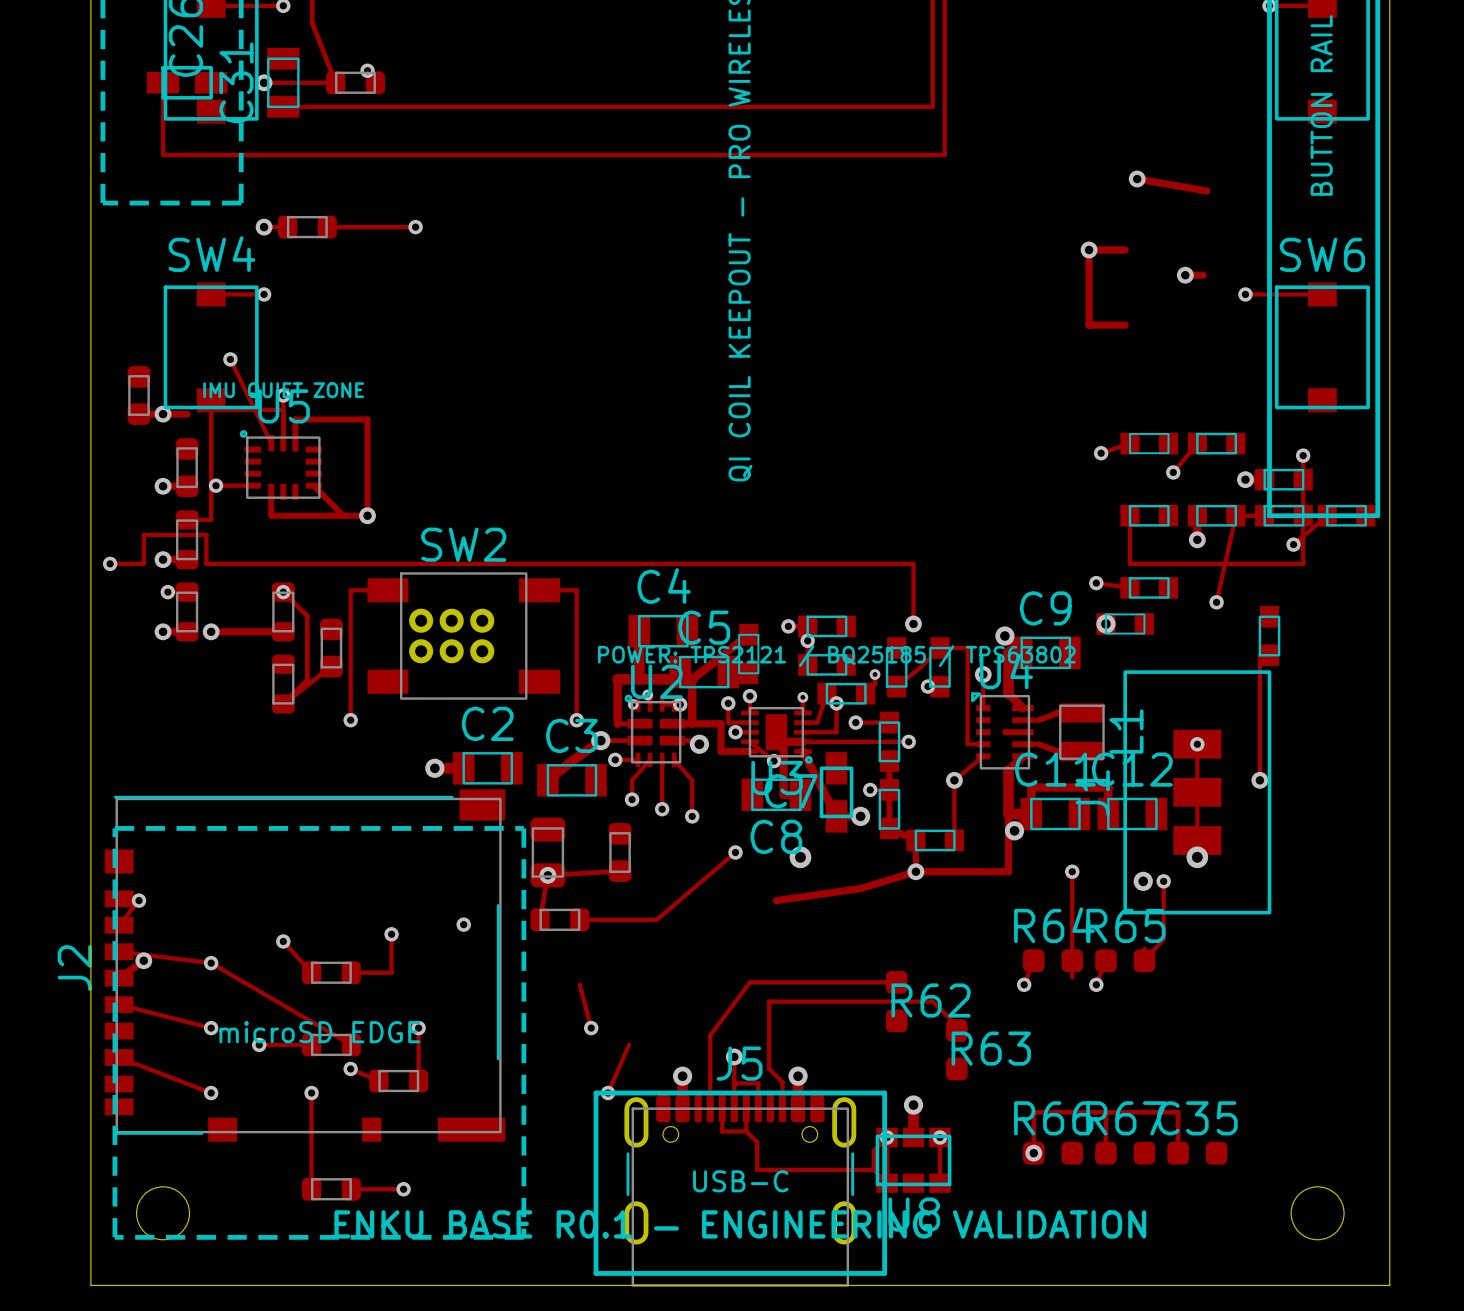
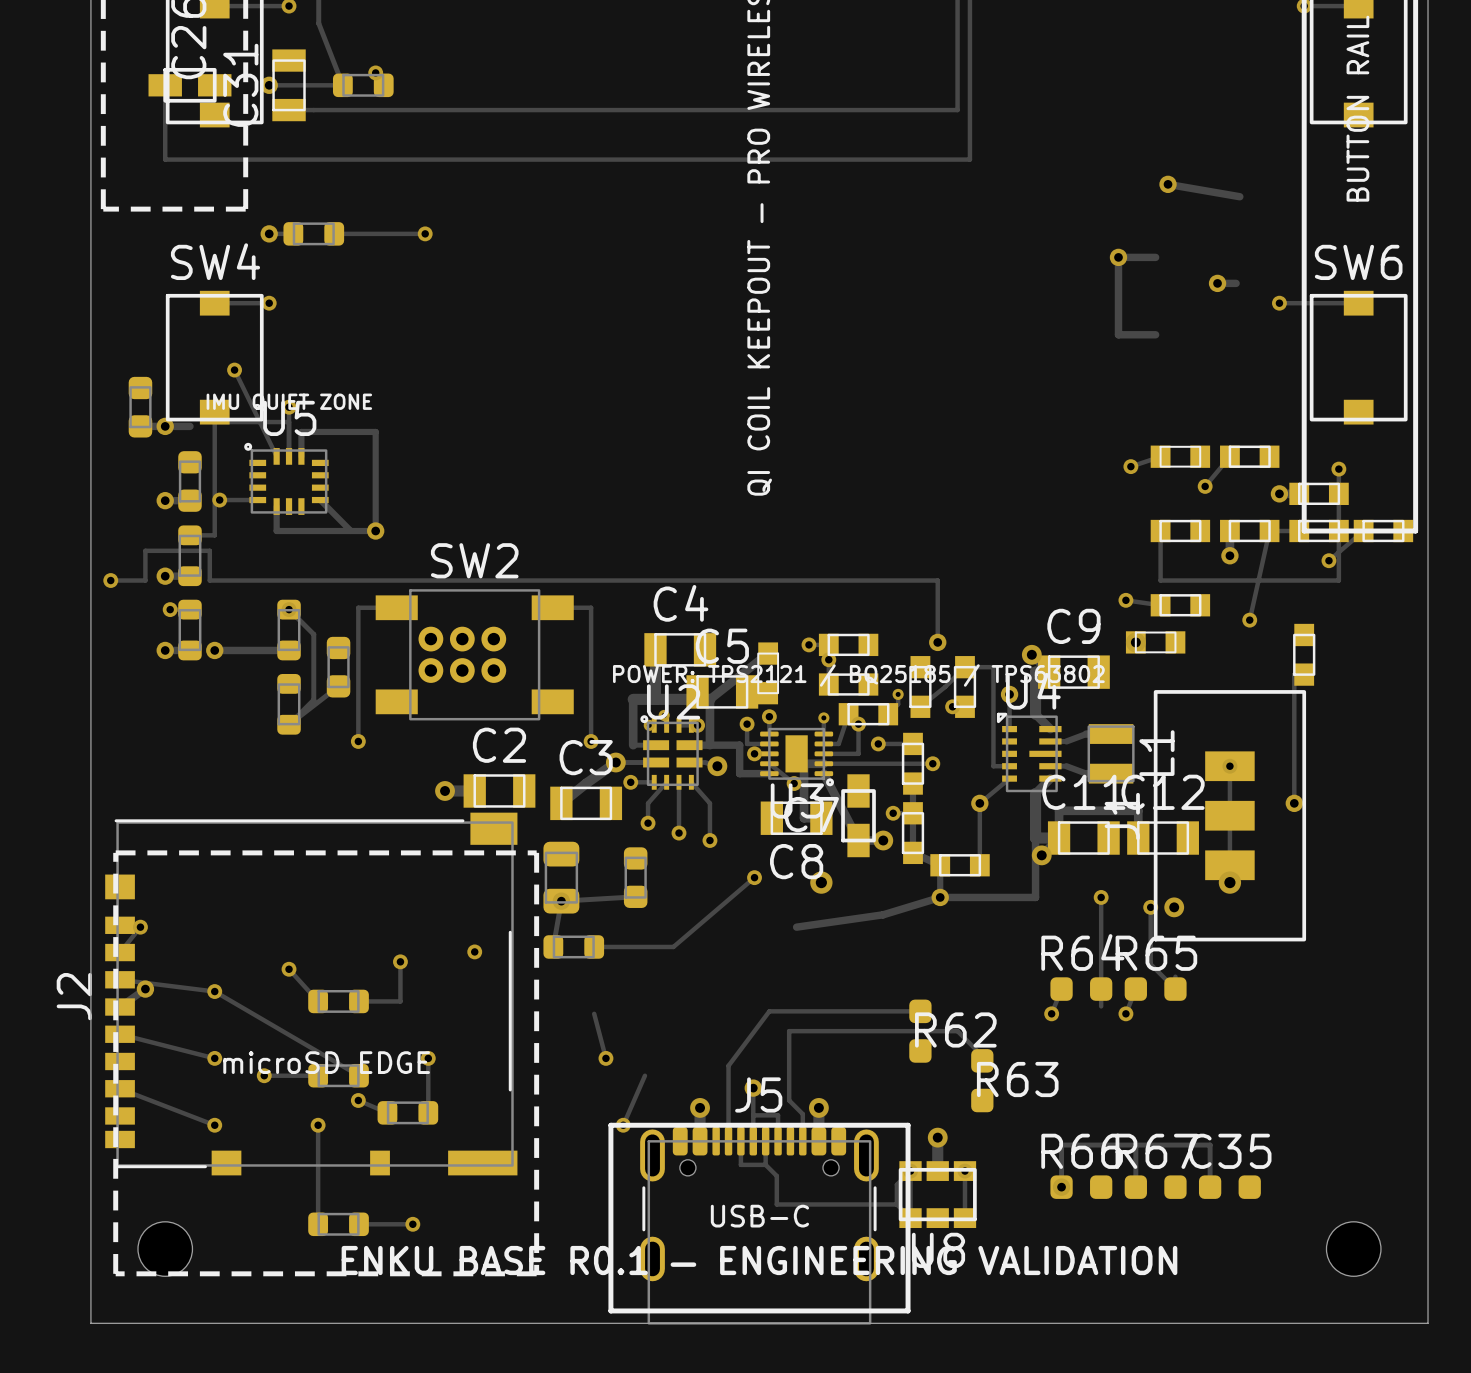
track: (1163, 881) (1163, 939) (1144, 960) -> (1150, 907) (1150, 964) (1175, 989)
via position: (1163, 881) -> (1150, 907)

